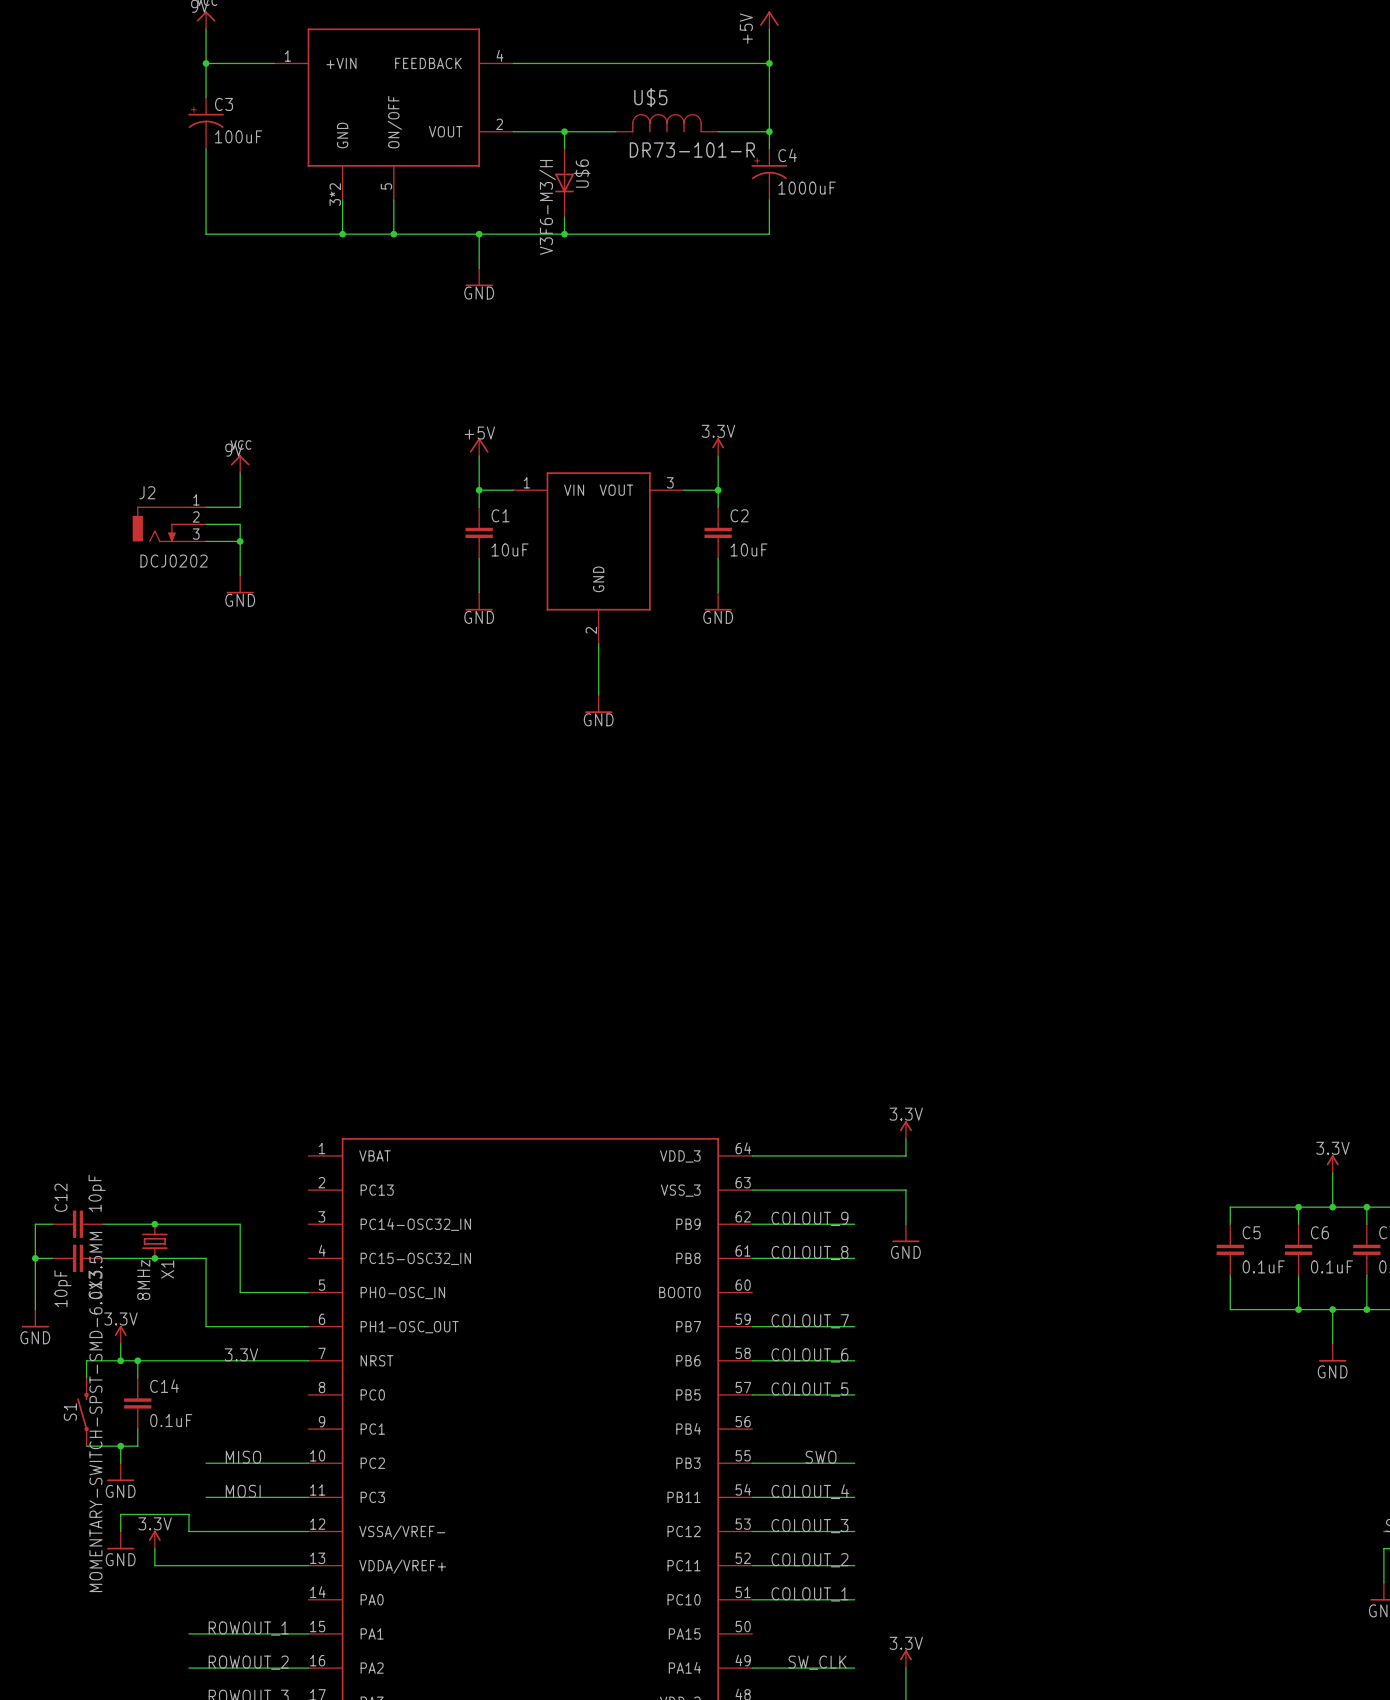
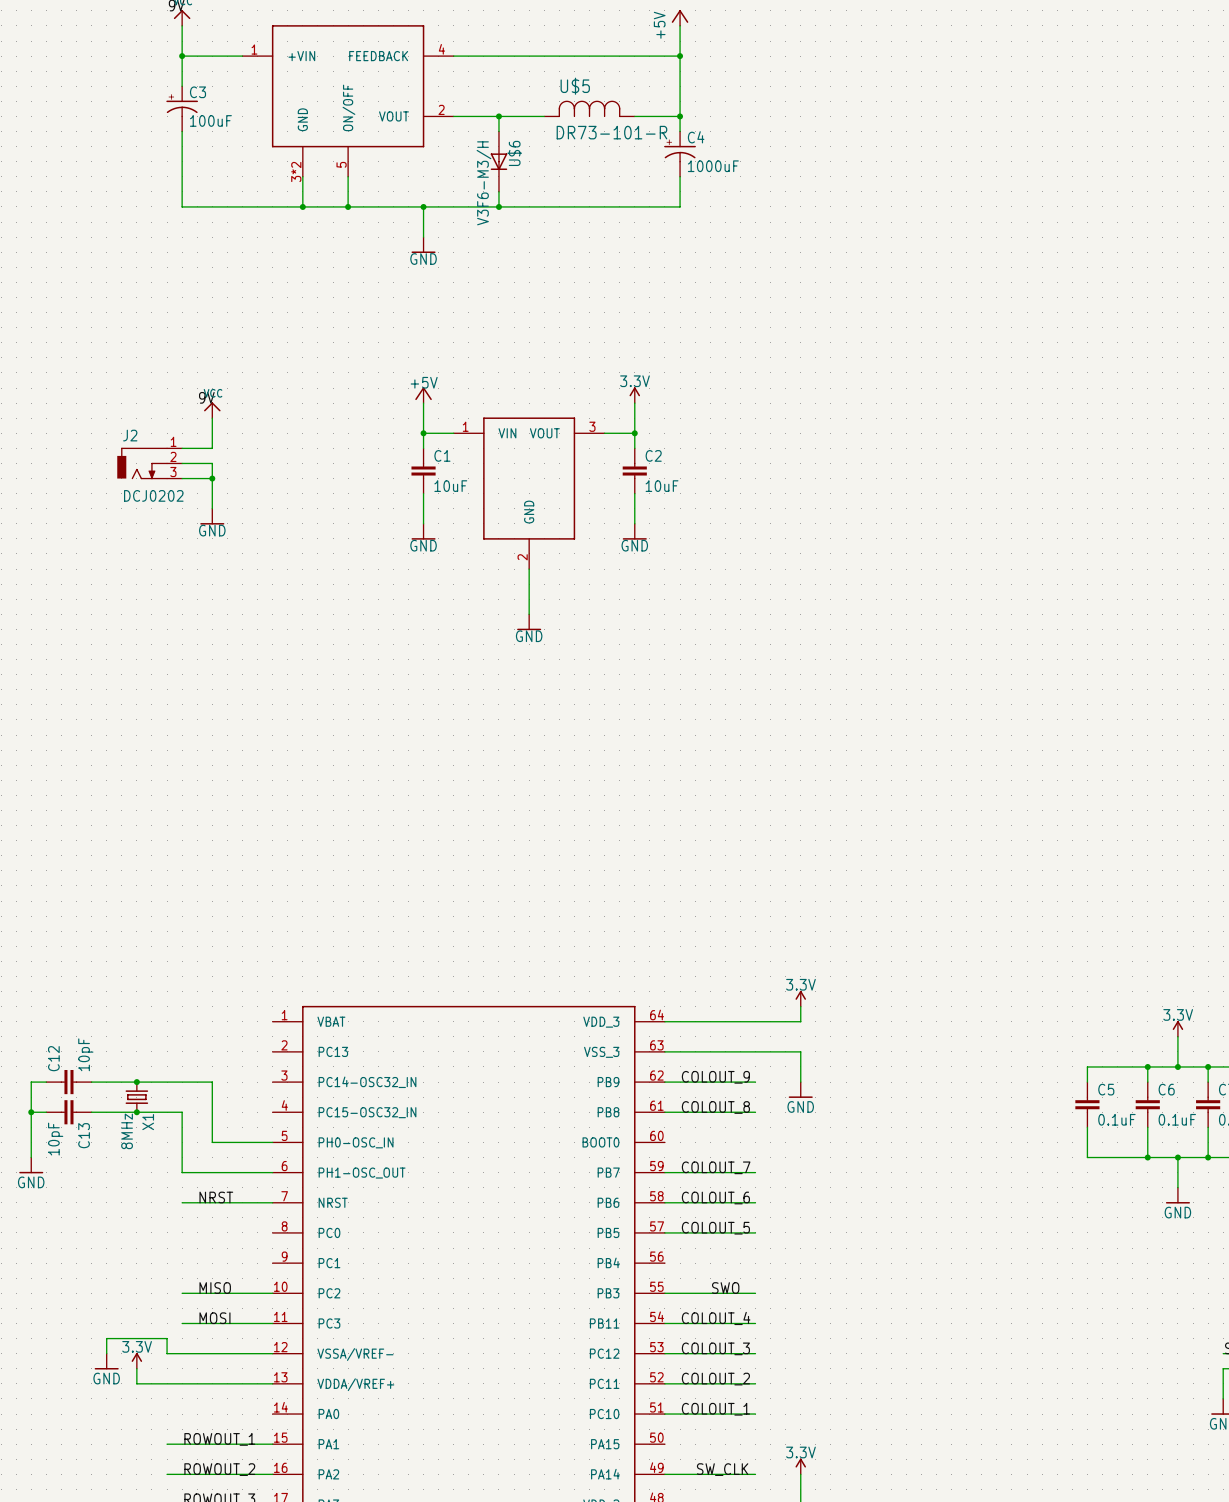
power symbol: 3.3V (120, 1334) -> none
wire: (120, 1343) (120, 1360) -> none
label: 3.3V (241, 1354) -> NRST (216, 1197)
junction: (120, 1360) -> none
wire: (137, 1360) (137, 1377) -> none
junction: (137, 1360) -> none
wire: (206, 1360) (86, 1360) (86, 1377) -> none
C14: 0.1uF (137, 1403) -> none
S1: MOMENTARY-SWITCH-SPST-SMD-6.0X3.5MM (82, 1412) -> none
wire: (137, 1429) (137, 1446) (86, 1446) -> none
wire: (120, 1446) (120, 1463) -> none
junction: (120, 1446) -> none
power symbol: GND (120, 1472) -> none

